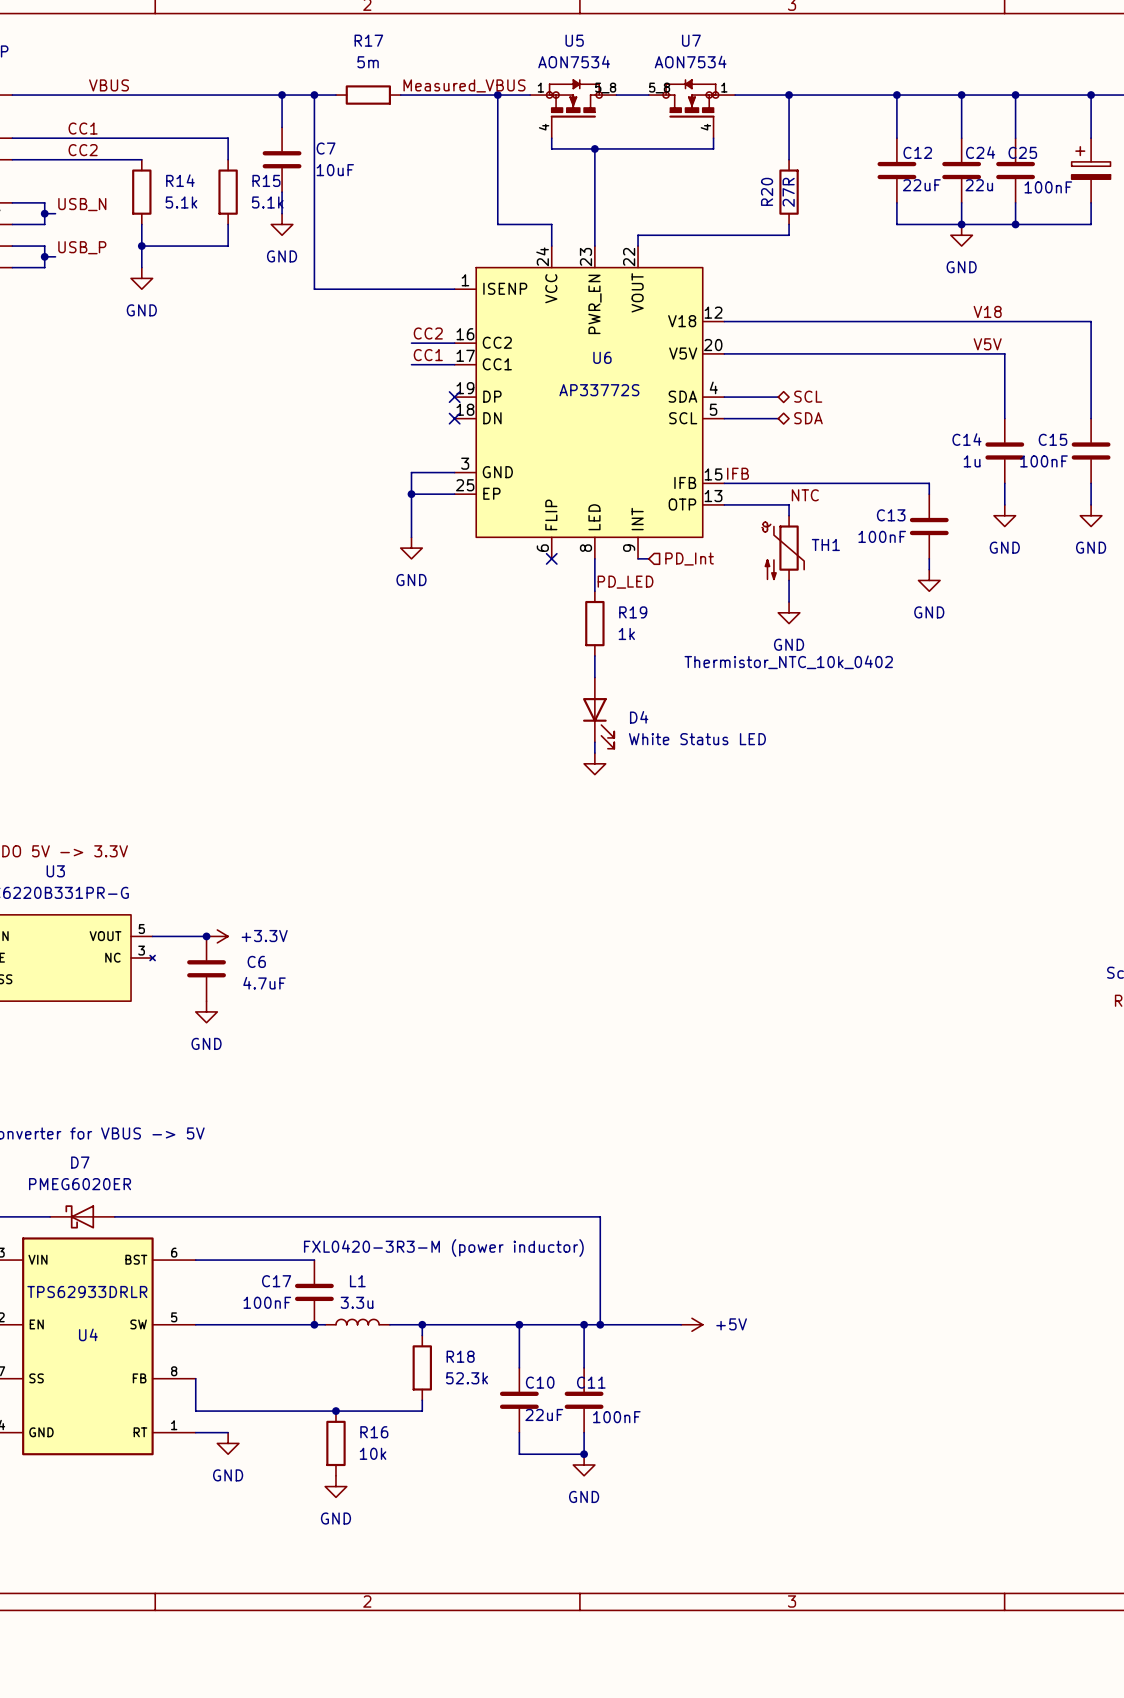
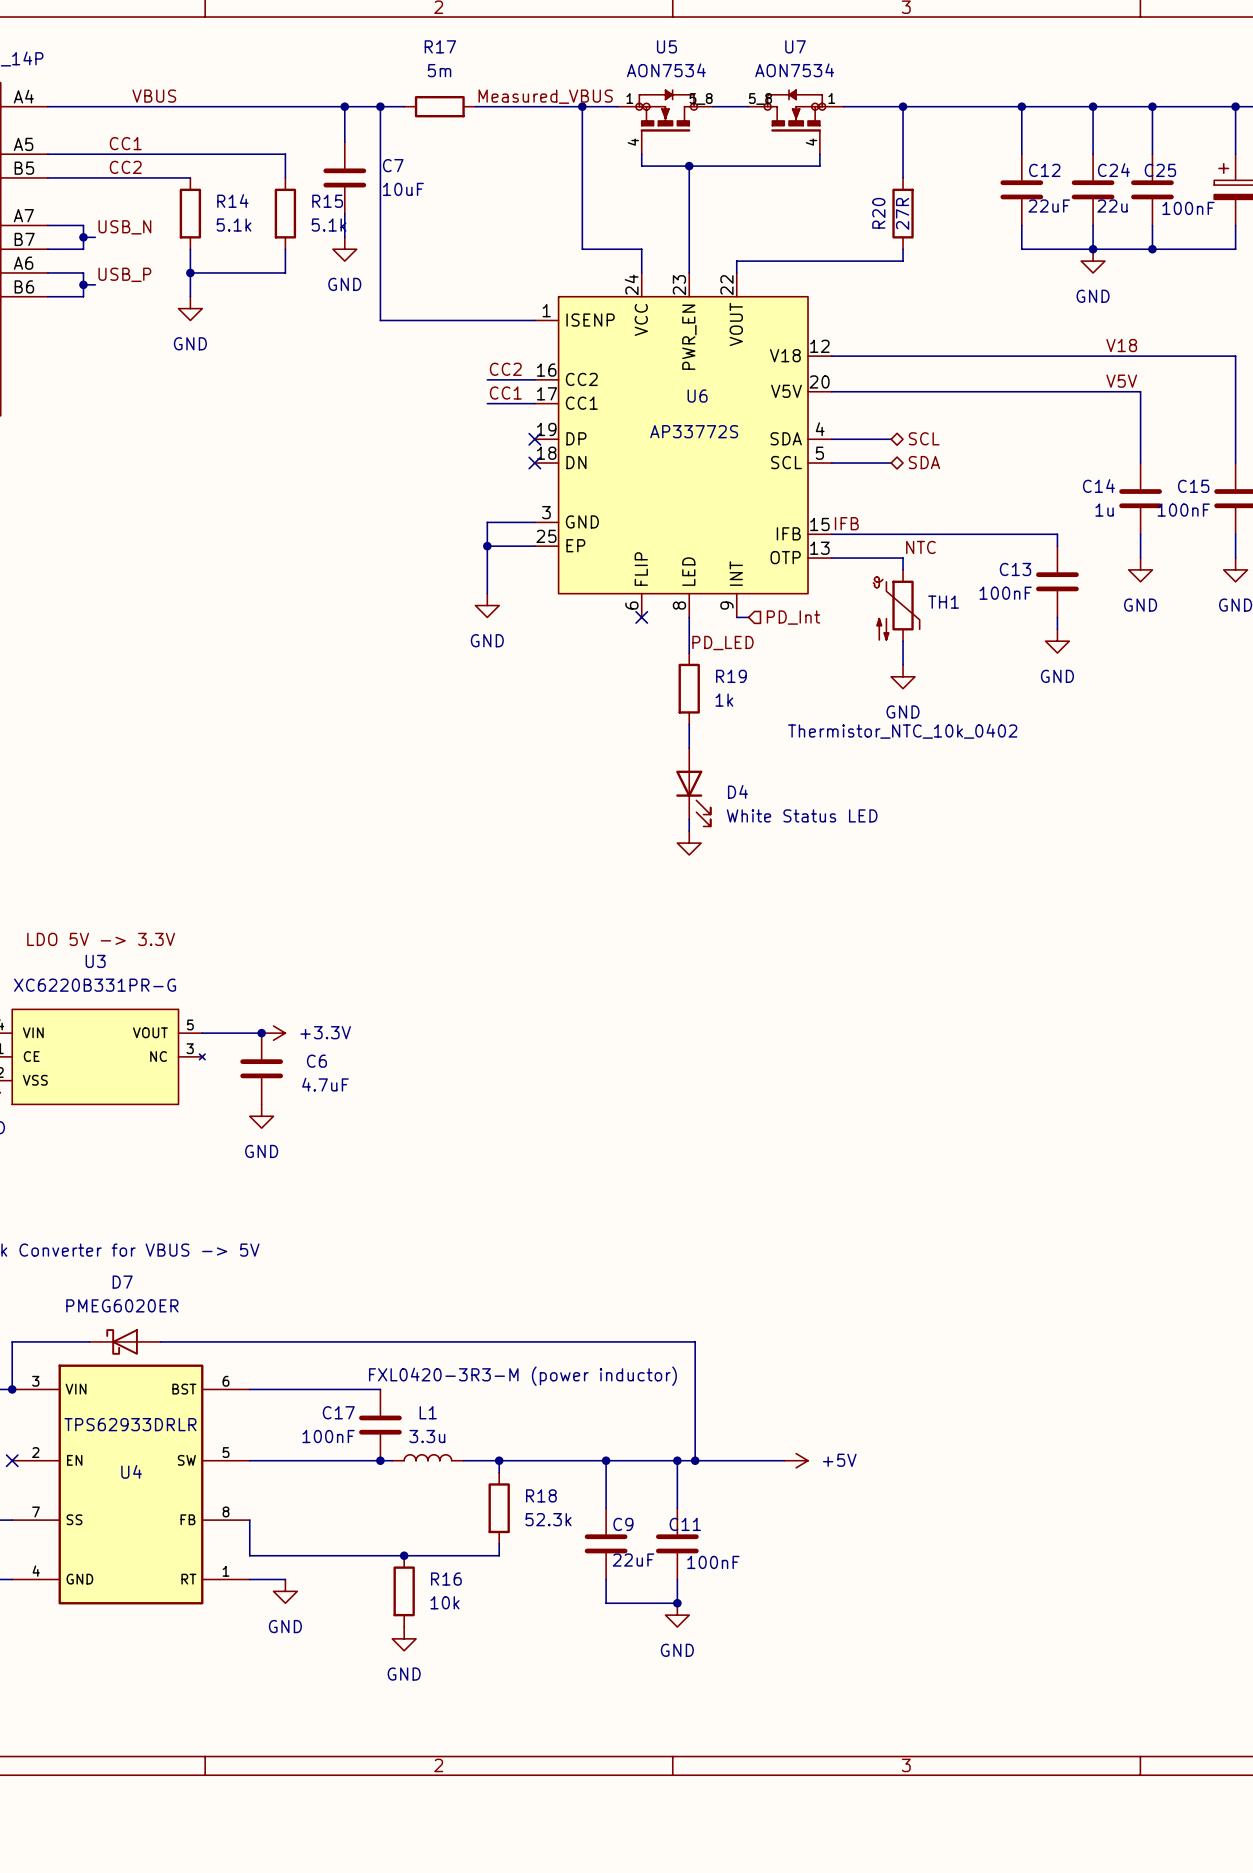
C10 name: C10 (540, 1382) -> C9 (623, 1524)

